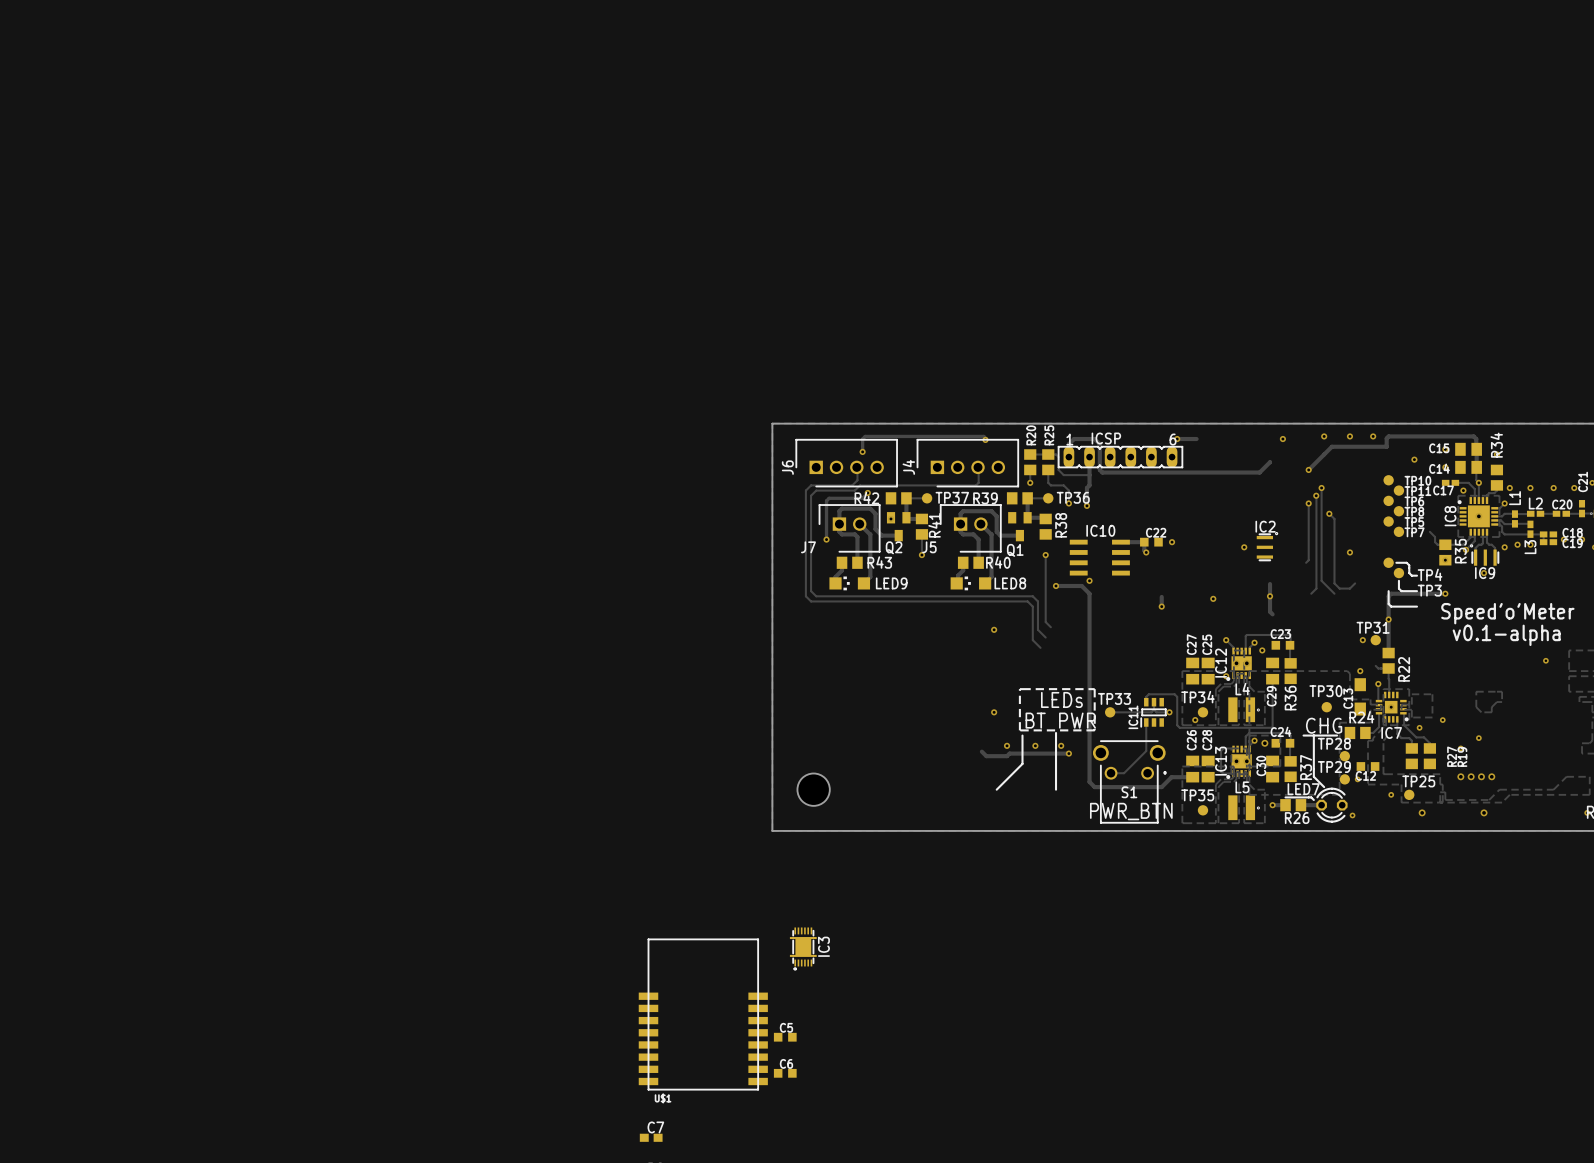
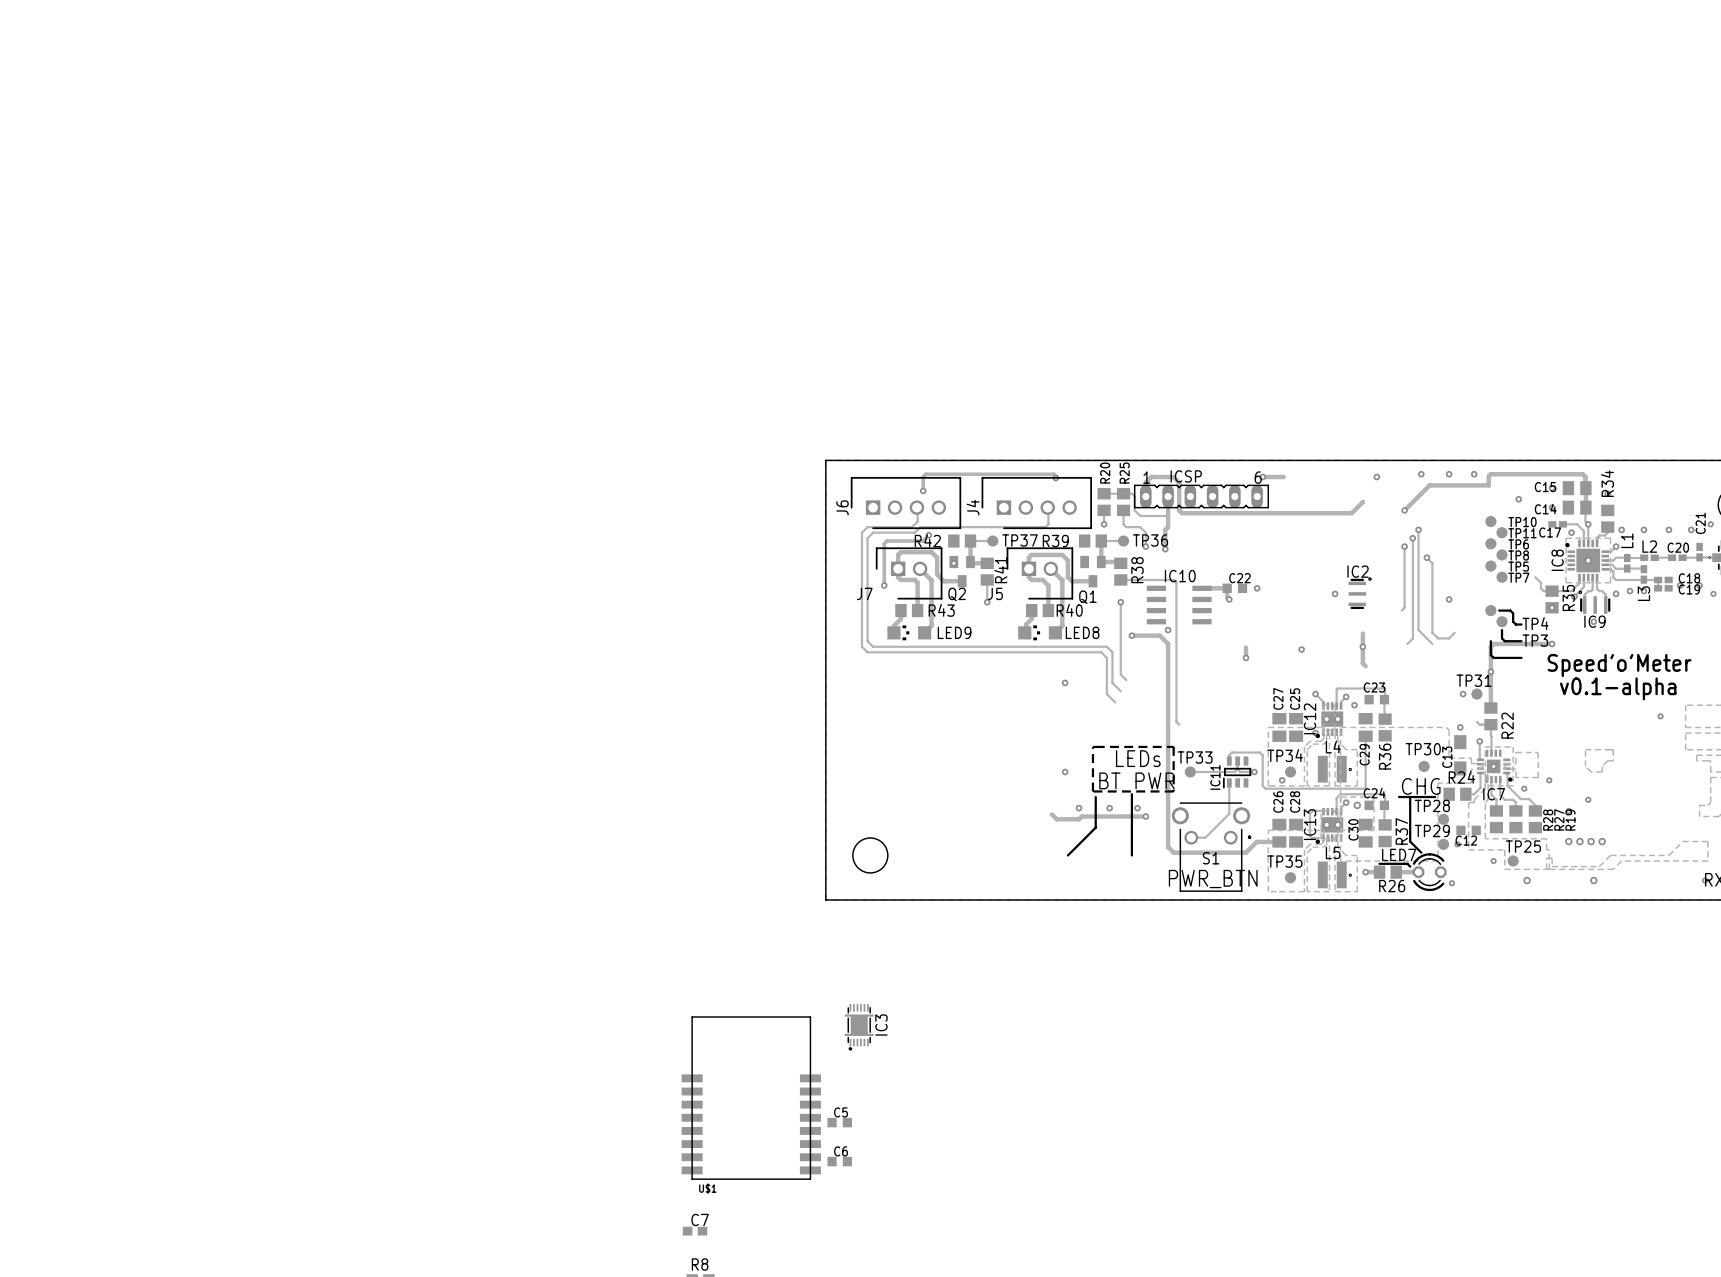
track: none -> (1120, 579) (1173, 579) (1176, 582) (1176, 721) (1179, 724)
track: none -> (1491, 779) (1491, 794) (1496, 799) (1496, 810)
R28: none -> (1496, 819)

